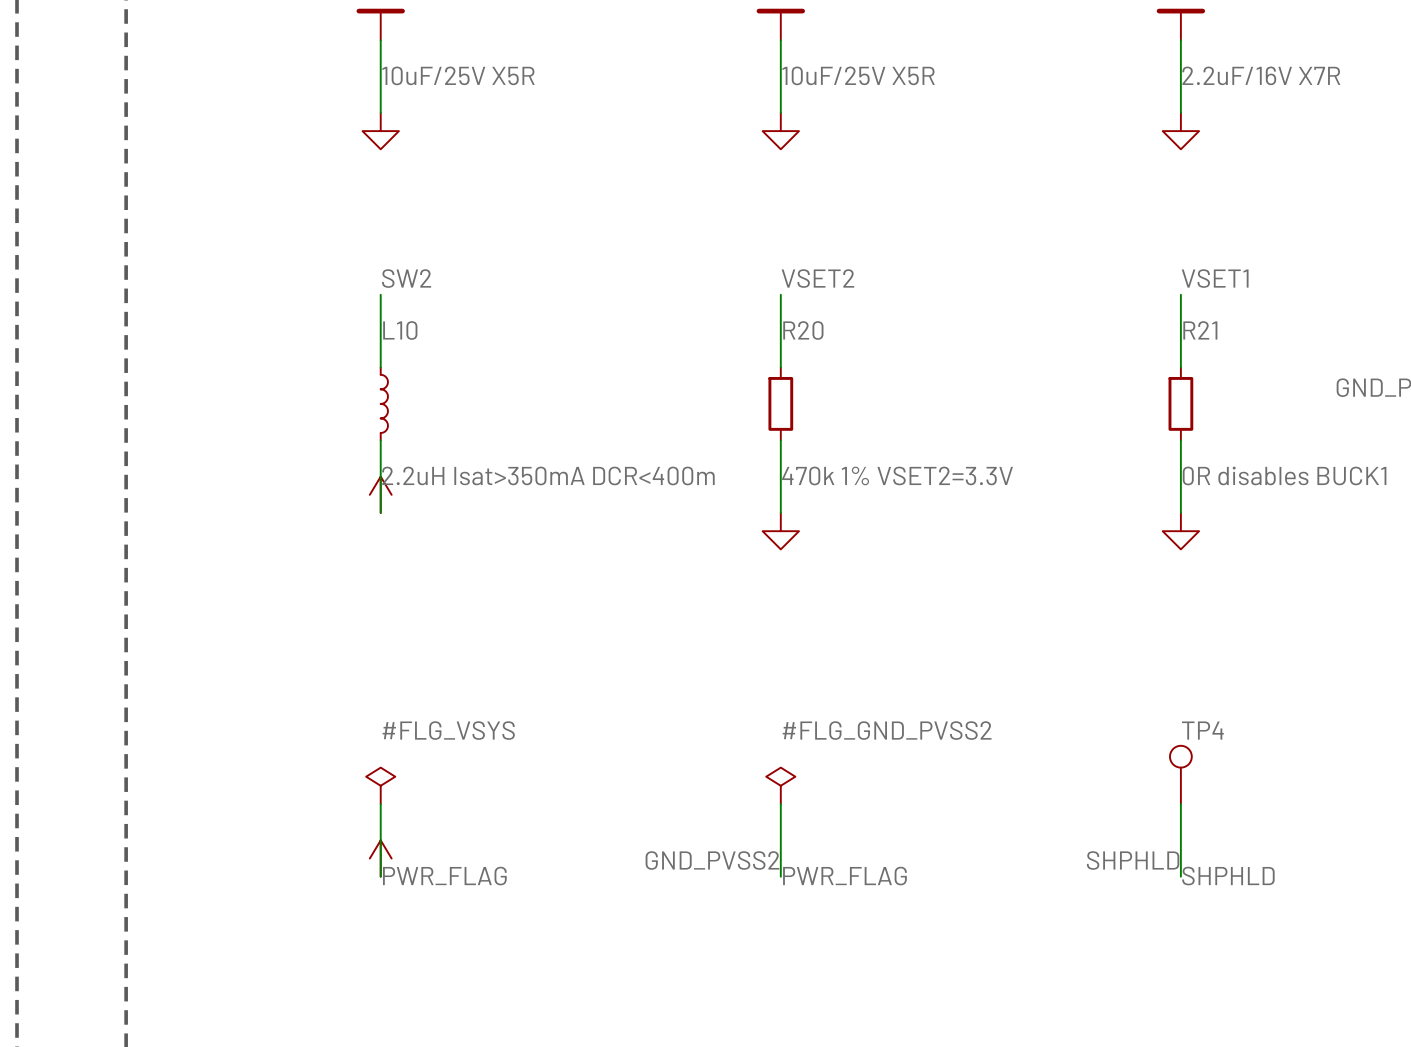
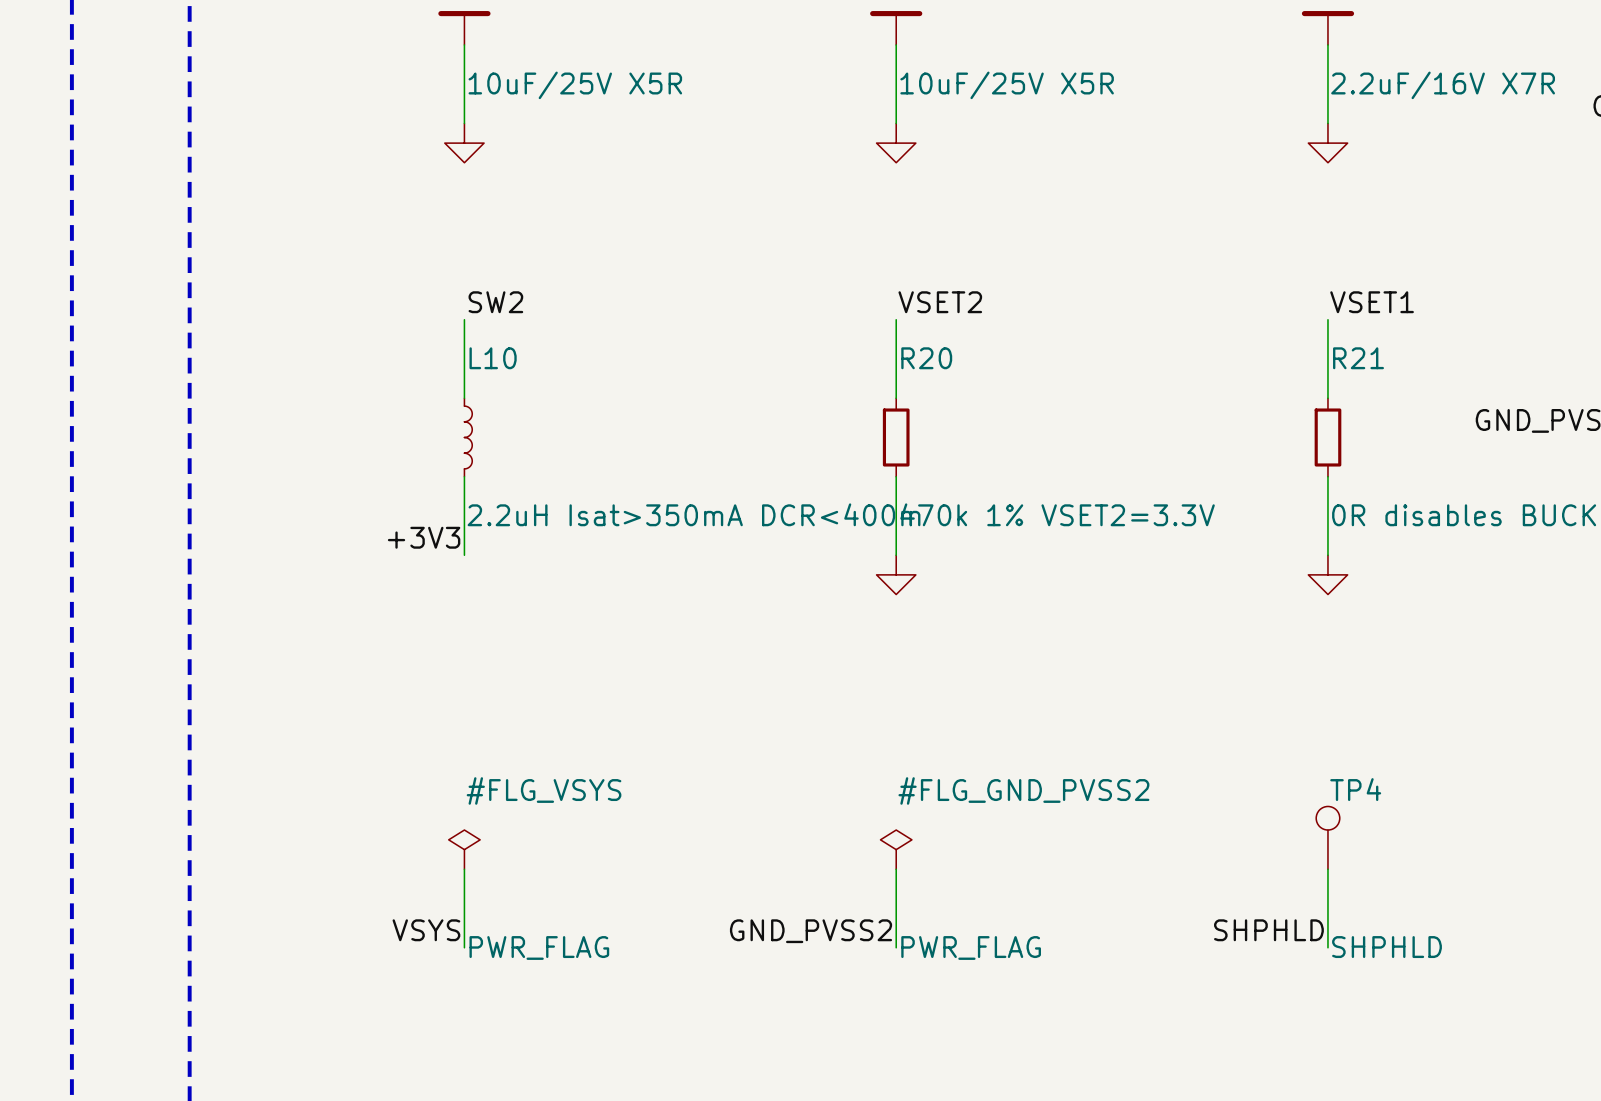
power symbol: (380, 494) -> none
label: none -> +3V3 (424, 537)
power symbol: (380, 858) -> none
label: none -> VSYS (426, 930)

